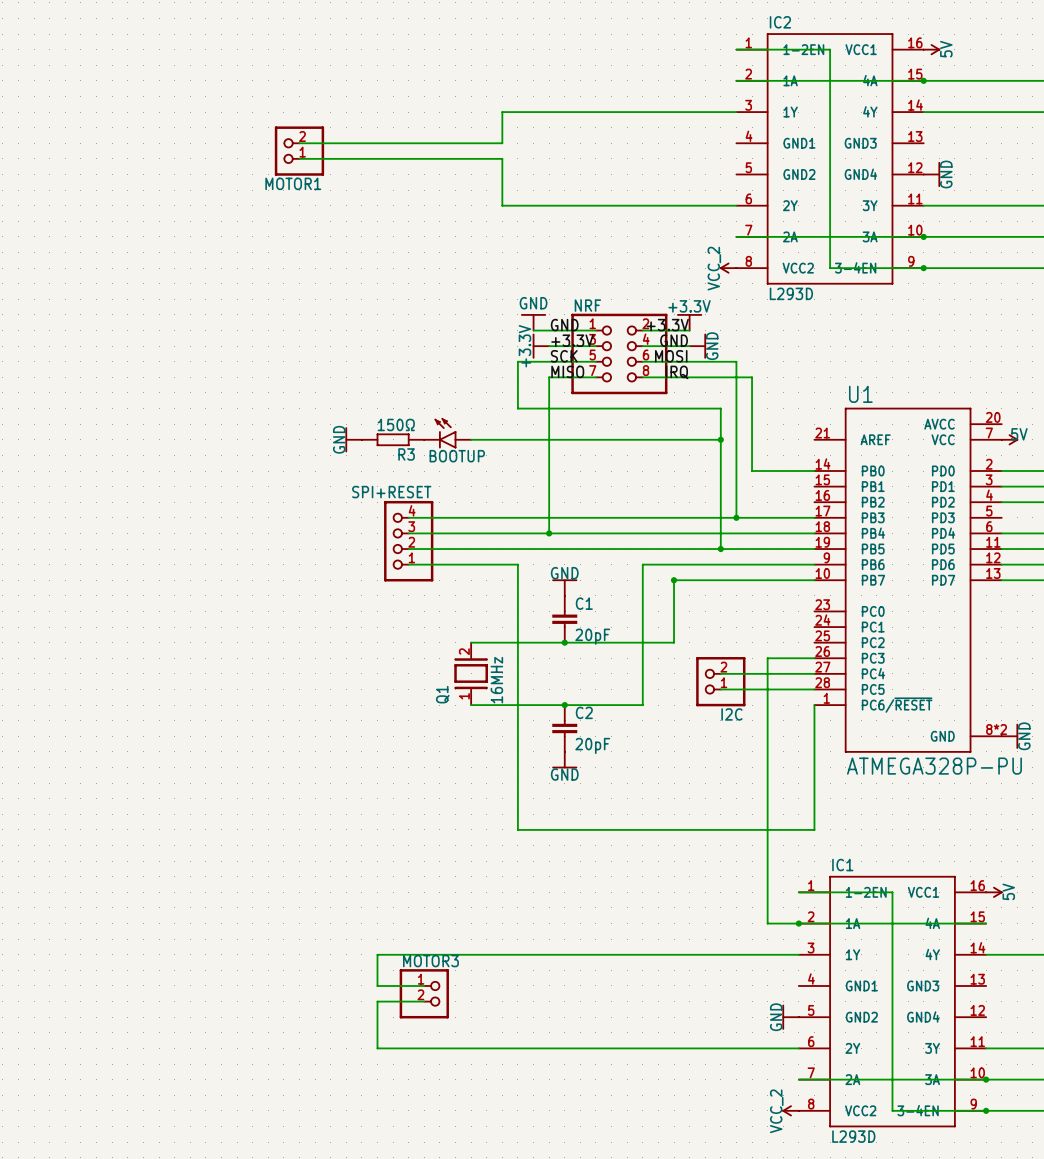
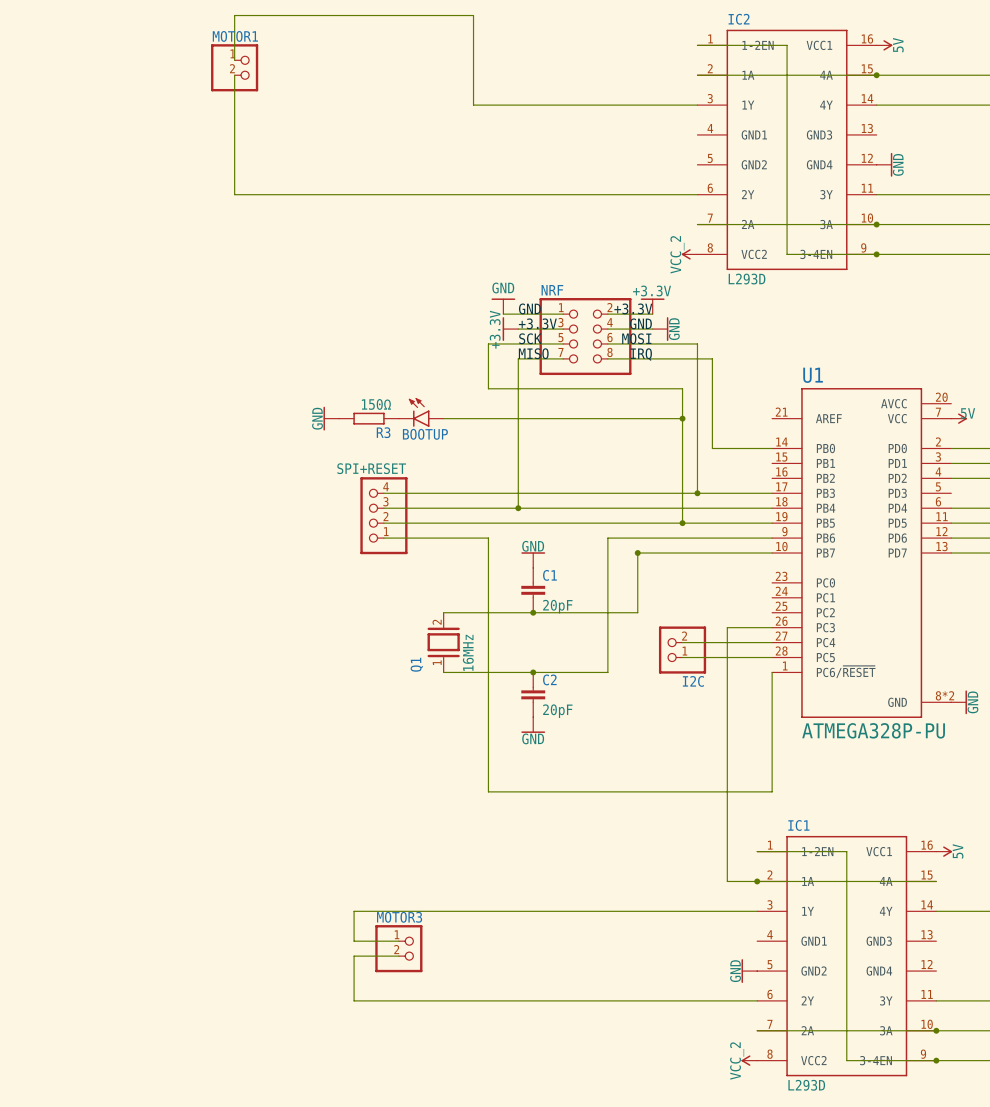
wire: (502, 112) (502, 143) (299, 143) -> (473, 105) (473, 15) (234, 15) (234, 60)
MOTOR1 rotation: 0° (299, 151) -> 180° (234, 67)
MOTOR1 position: (299, 151) -> (234, 67)
wire: (299, 158) (502, 158) (502, 205) -> (234, 75) (234, 194) (473, 194)

